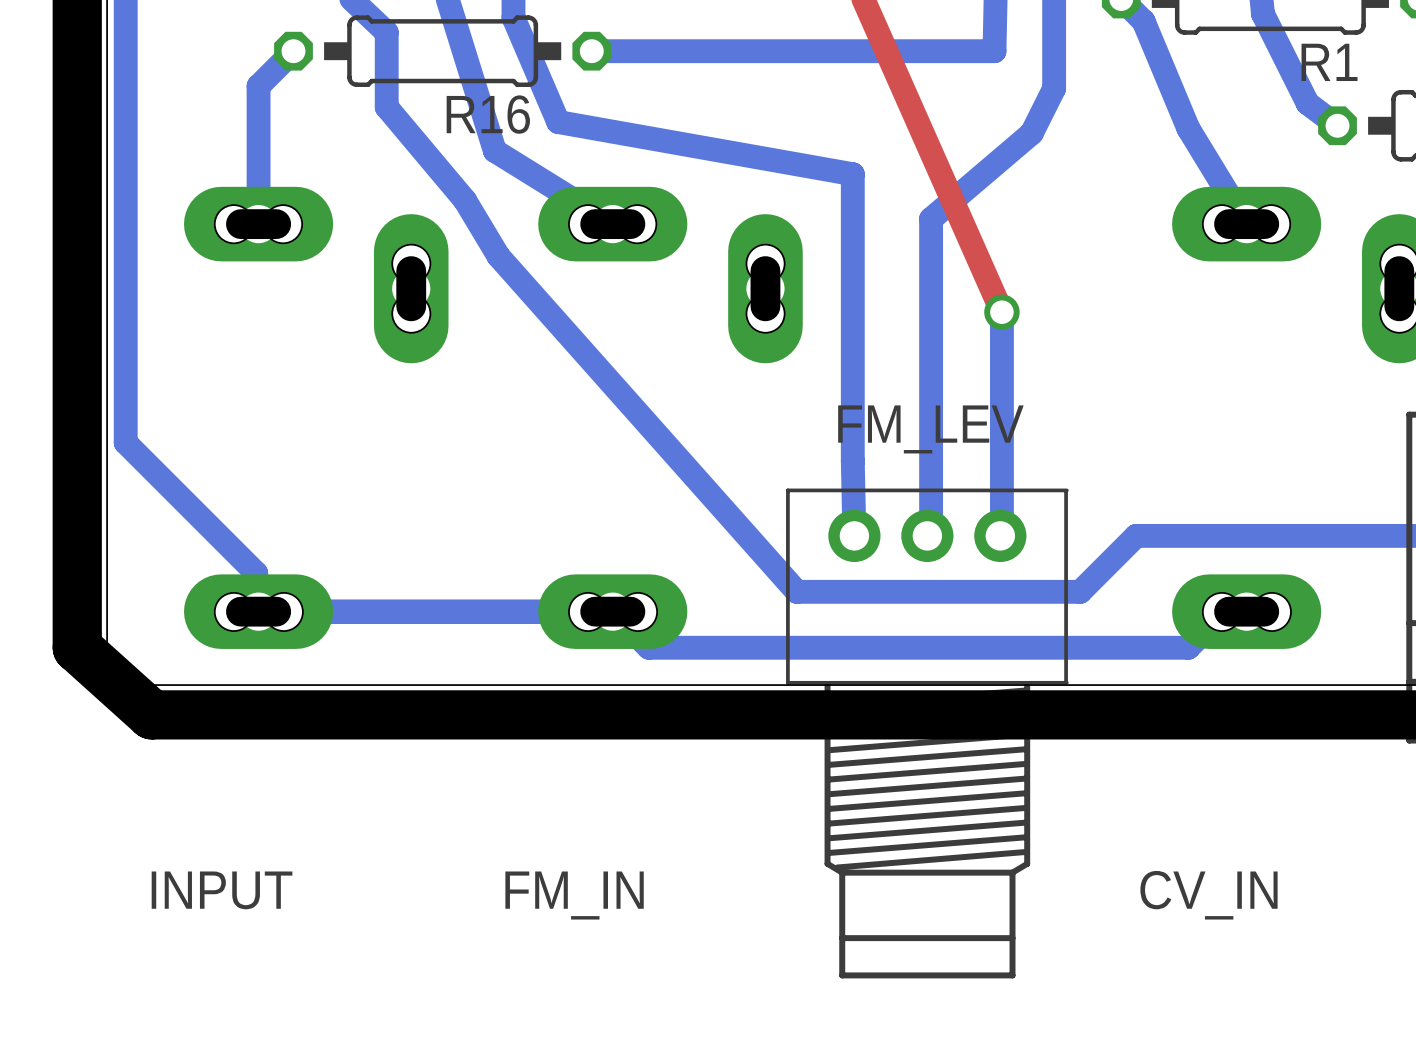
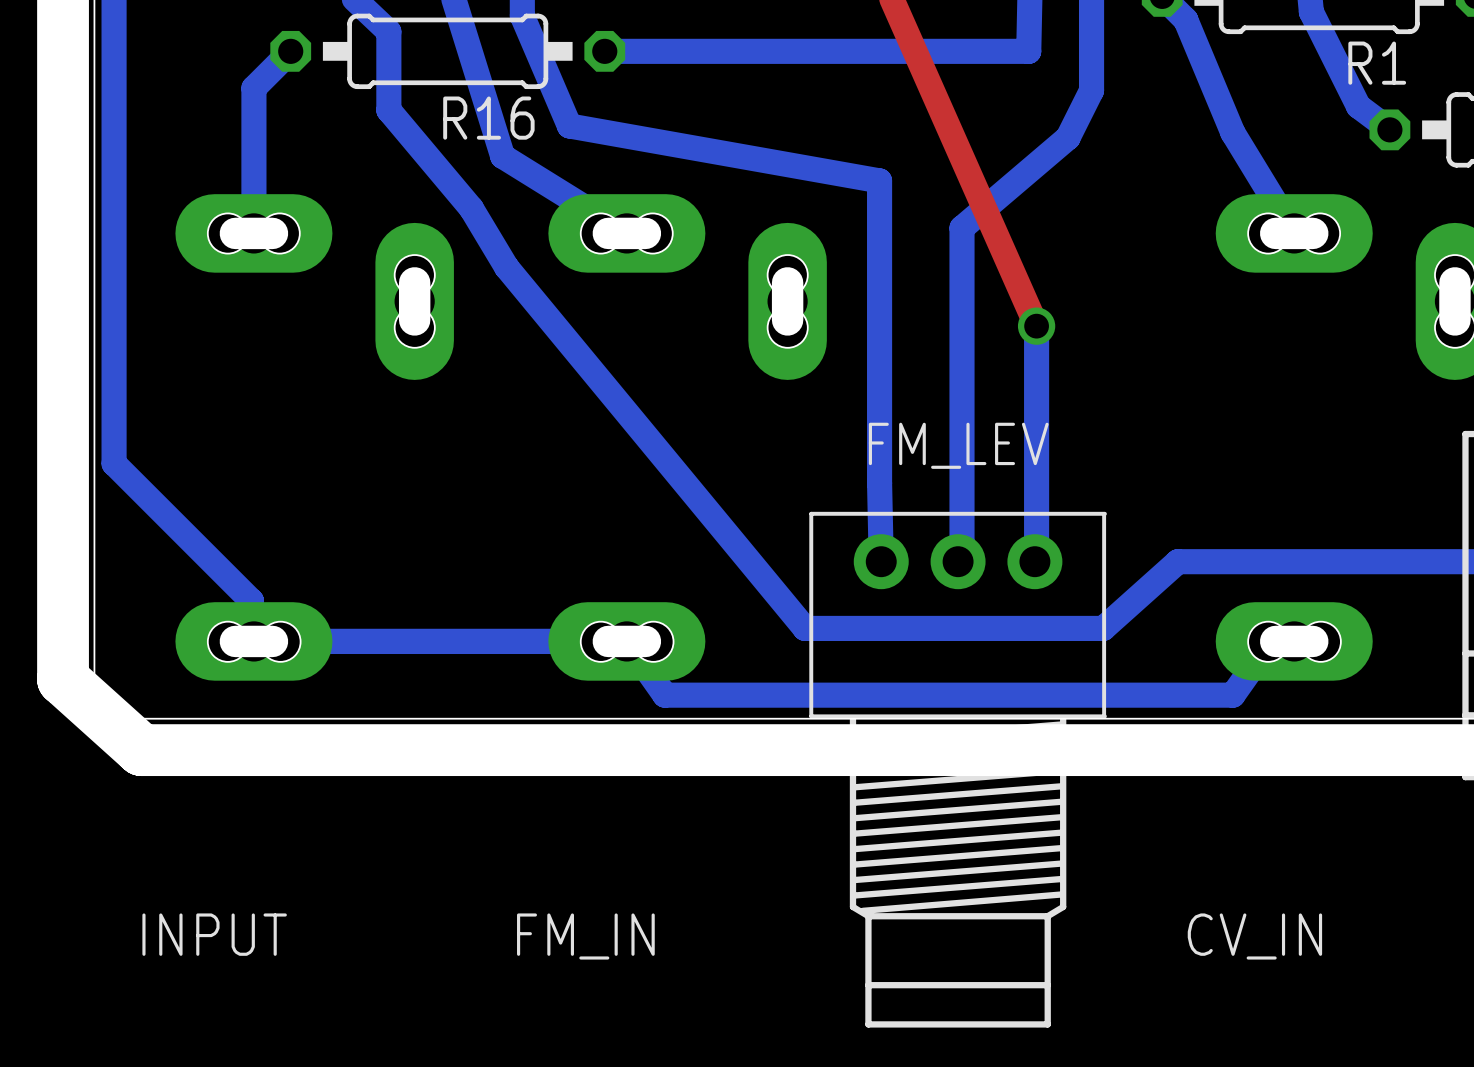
bottom track: (498, 256) (796, 591) (1080, 591) (1136, 535) -> (506, 267) (804, 628) (1103, 628) (1177, 561)
bottom track: (612, 611) (648, 647) (1188, 647) (1224, 611) -> (626, 641) (664, 695) (1232, 695) (1270, 641)

